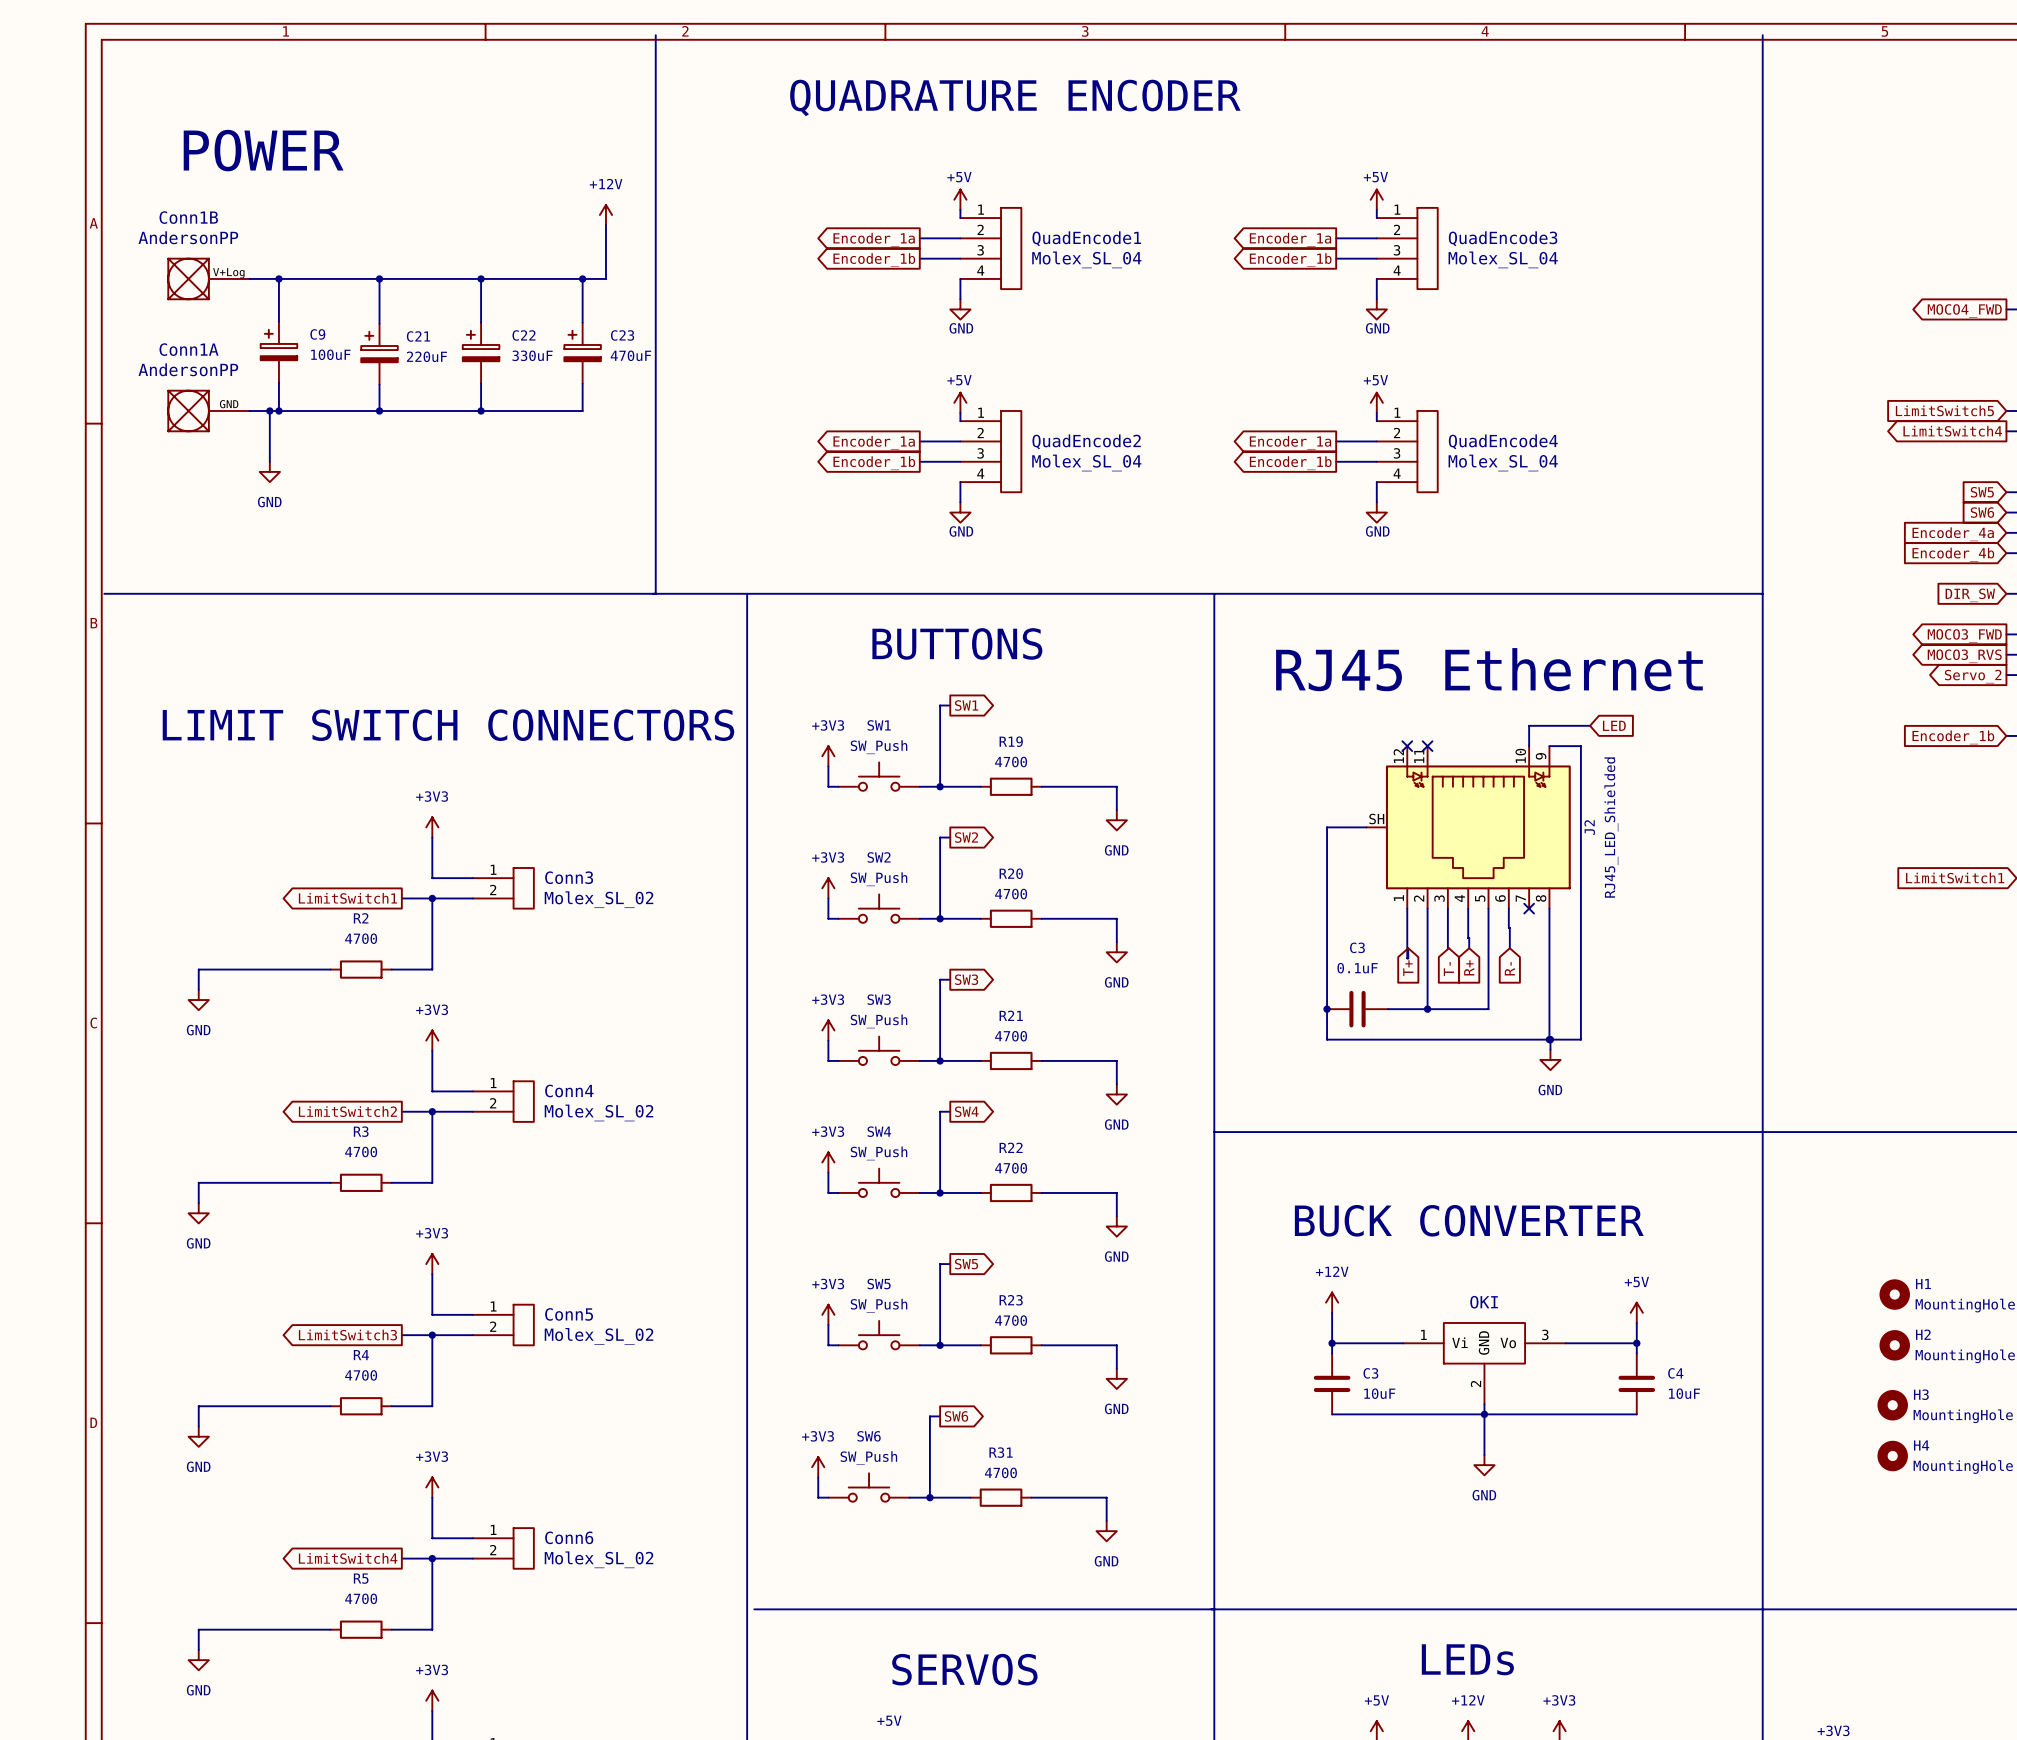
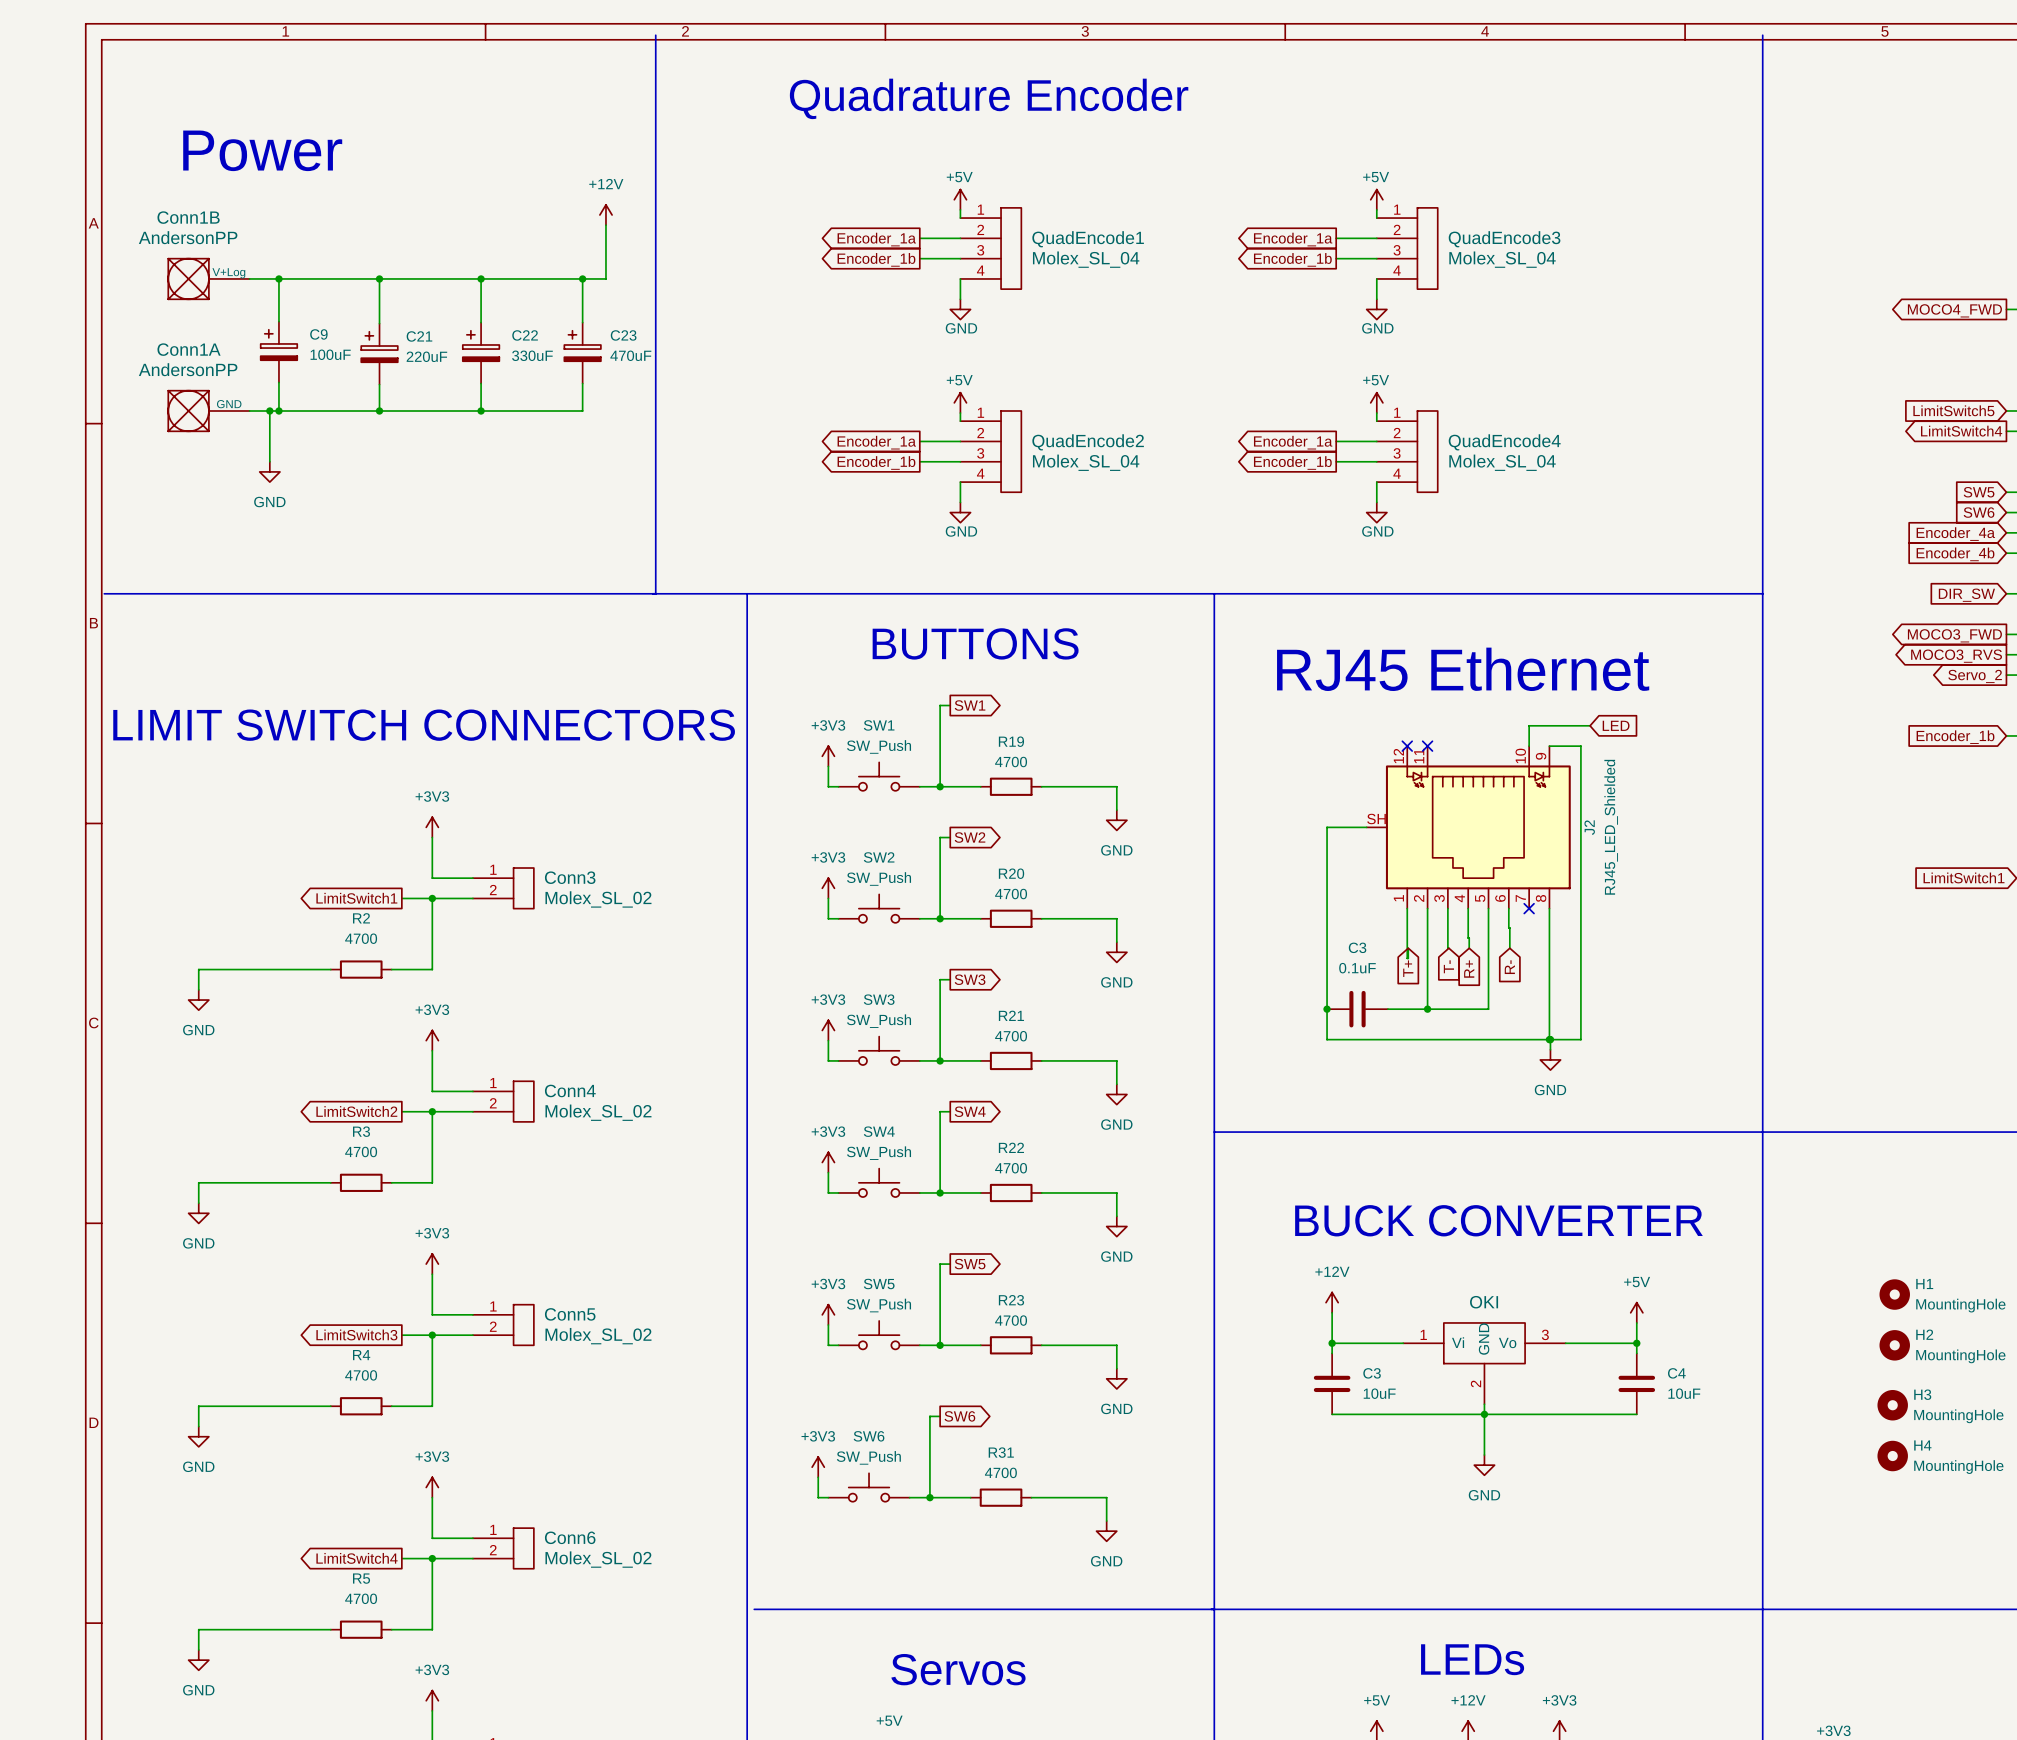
text: QUADRATURE ENCODER (1015, 98) -> Quadrature Encoder (989, 98)
text: POWER (263, 150) -> Power (262, 150)
text: SERVOS (964, 1669) -> Servos (958, 1669)

